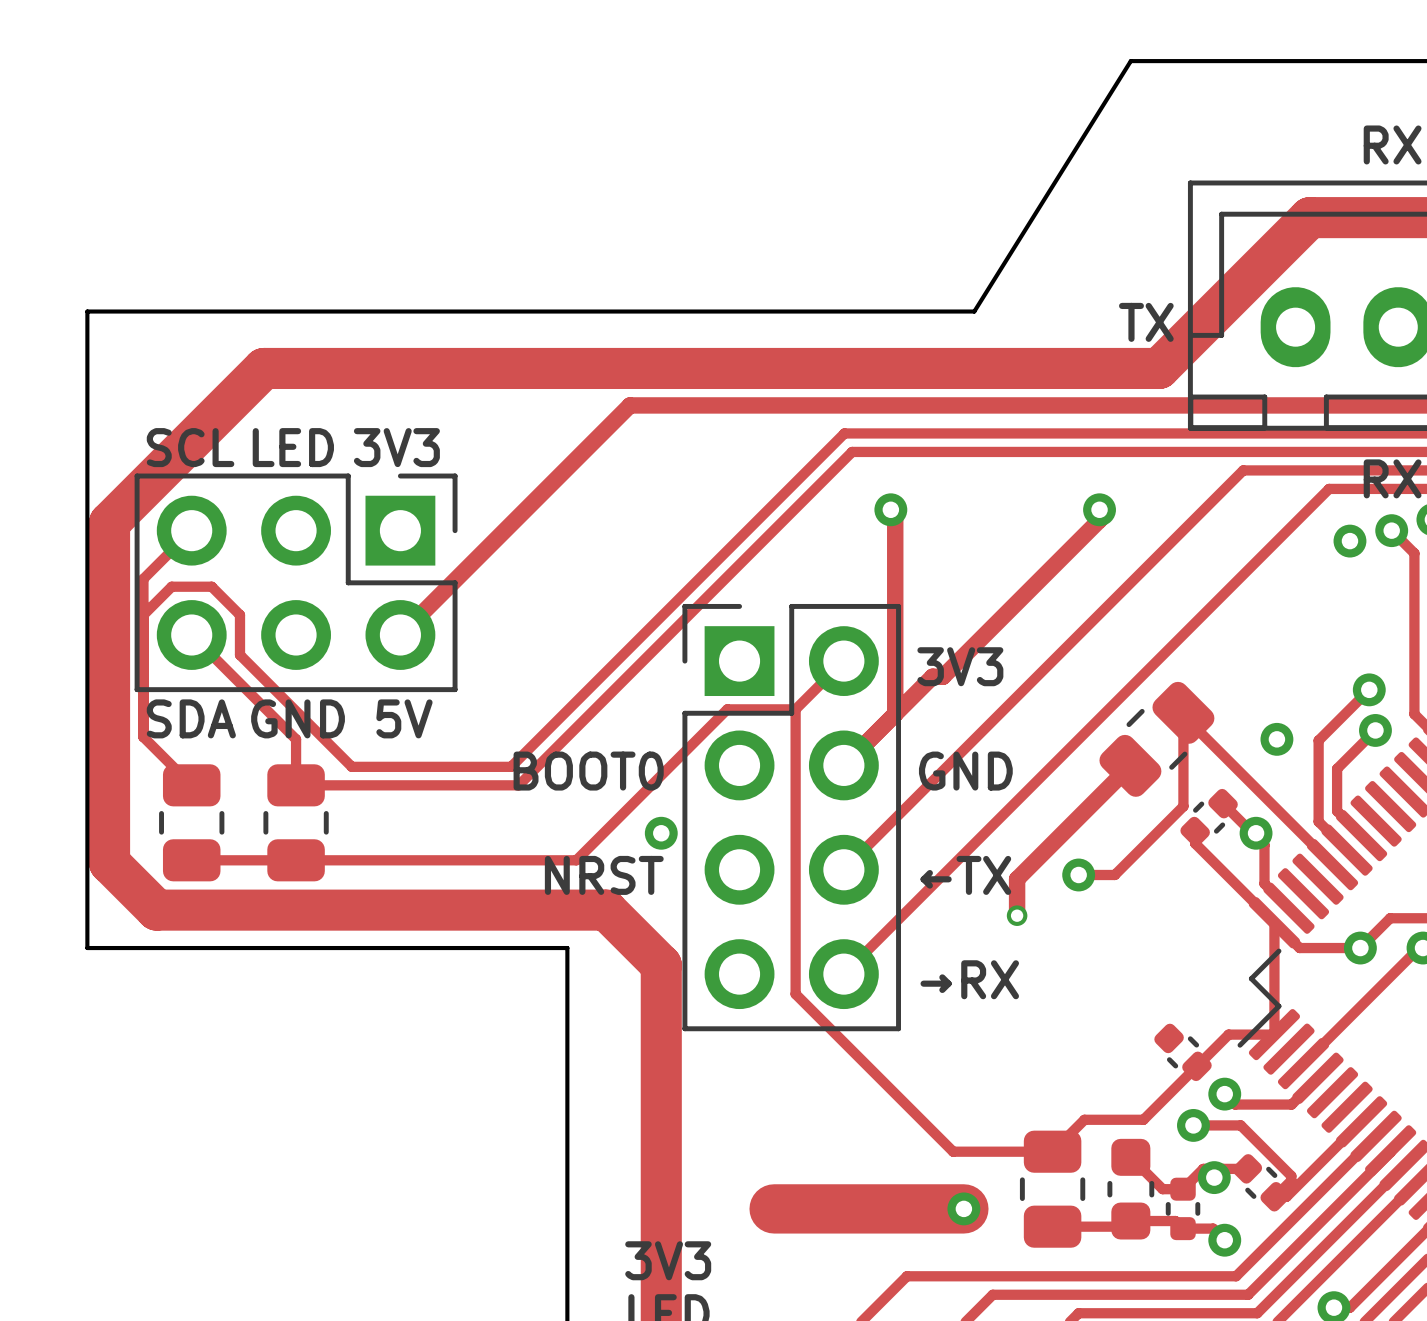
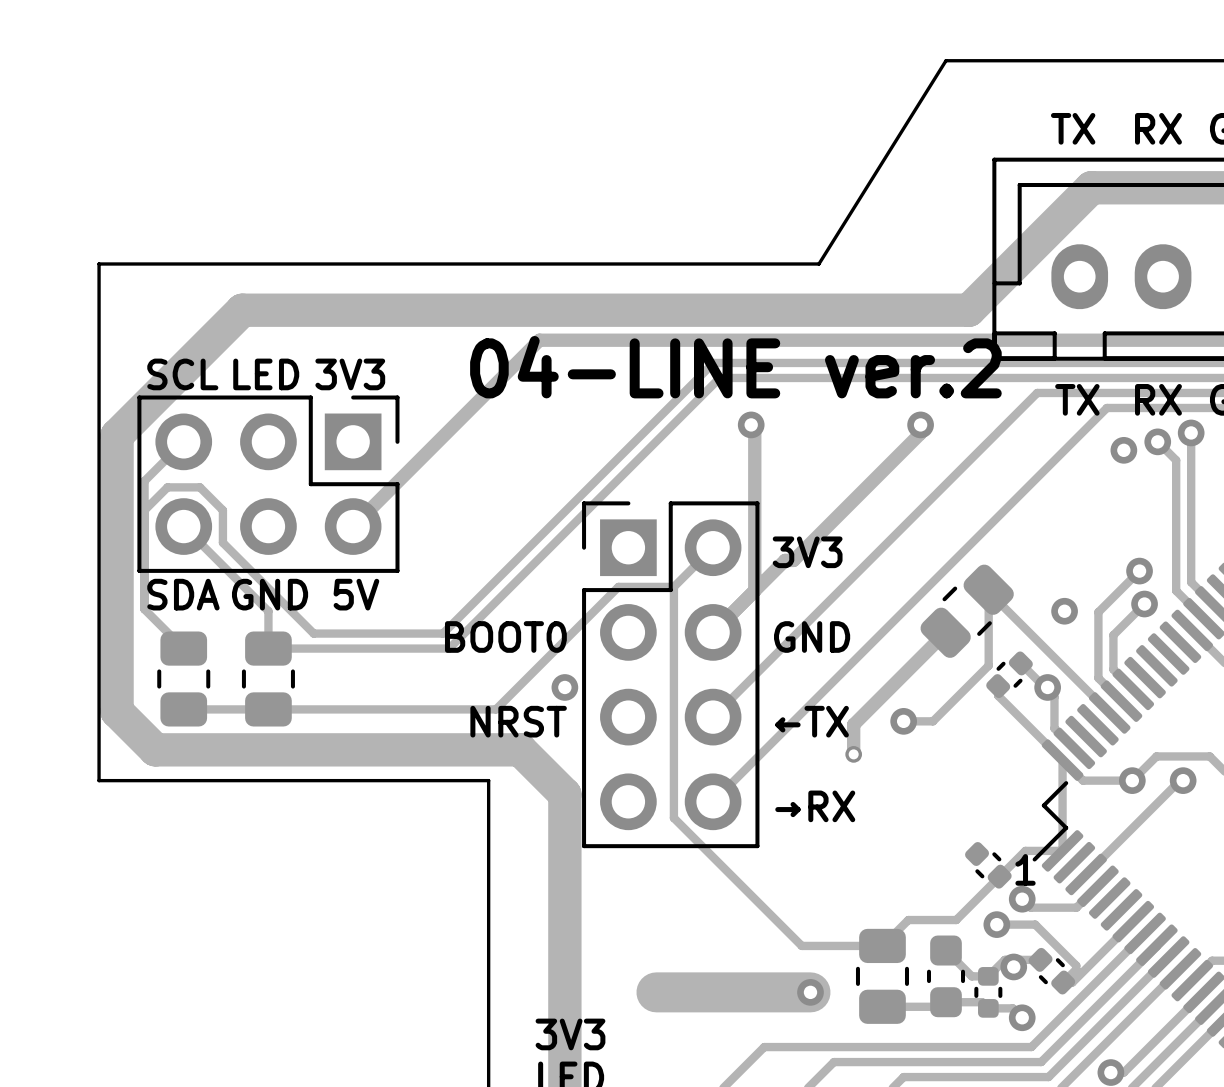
text: none -> TX (1073, 128)
text: TX (1146, 322) -> none
text: none -> 04-LINE ver.2 (735, 367)
text: none -> TX (1077, 399)
text: none -> 1 (1025, 869)

